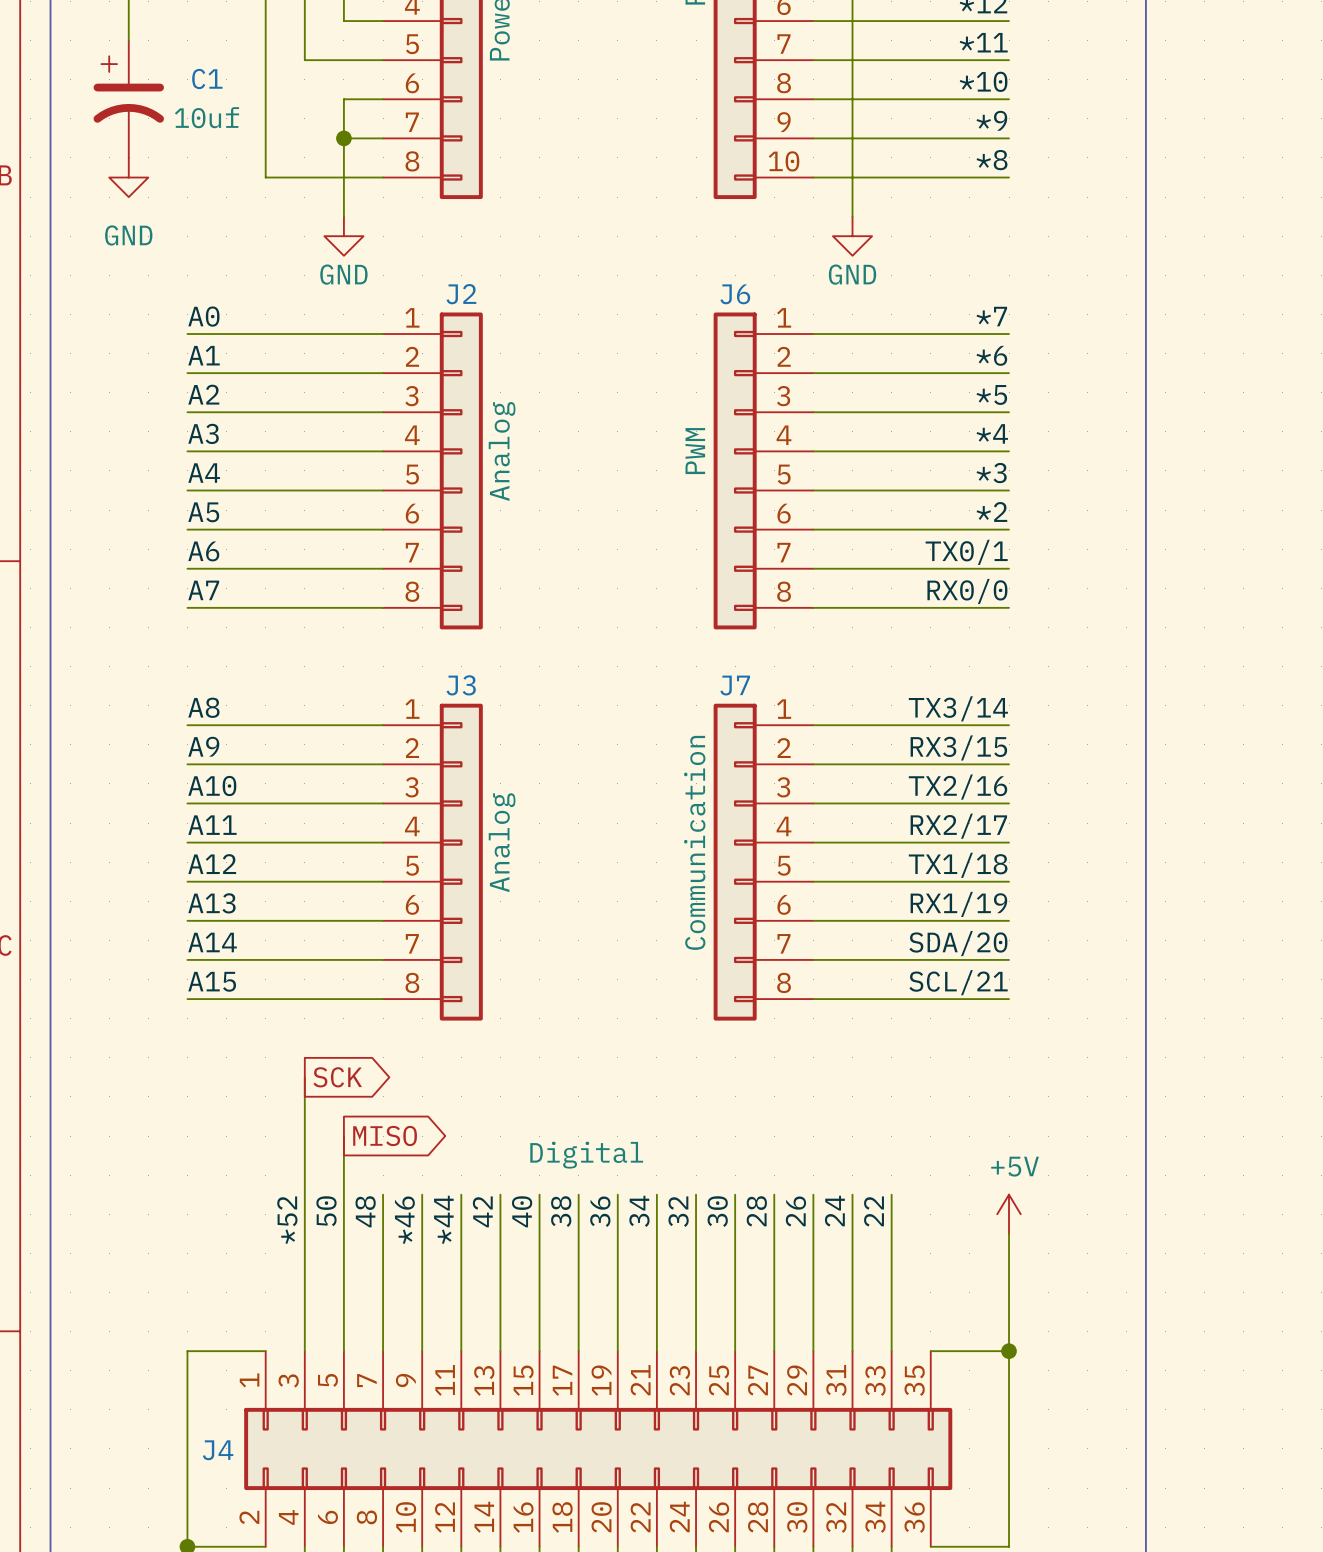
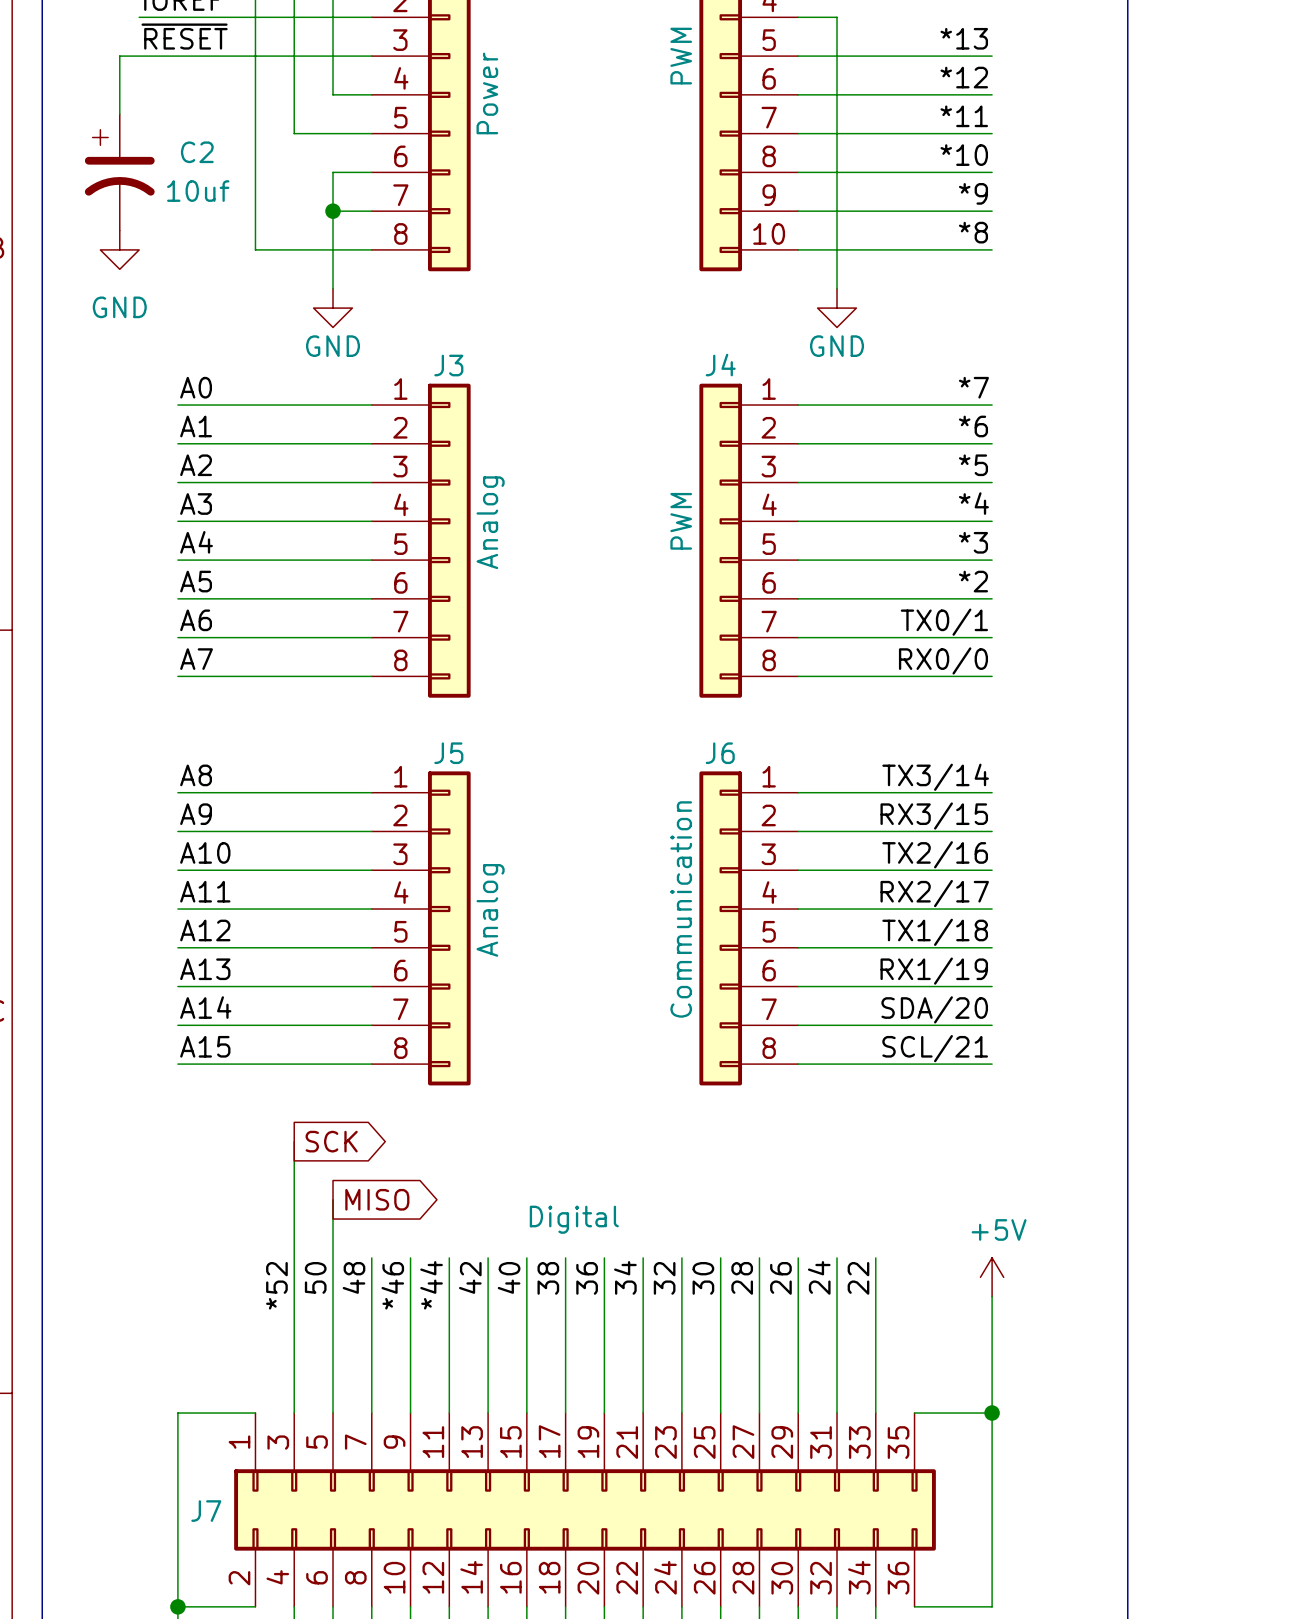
C1 name: C1 (207, 78) -> C2 (197, 152)
J2 name: J2 (461, 294) -> J3 (448, 365)
J6 name: J6 (735, 294) -> J4 (720, 365)
J3 name: J3 (461, 685) -> J5 (448, 753)
J7 name: J7 (735, 685) -> J6 (720, 753)
J4 name: J4 (218, 1450) -> J7 (206, 1511)

